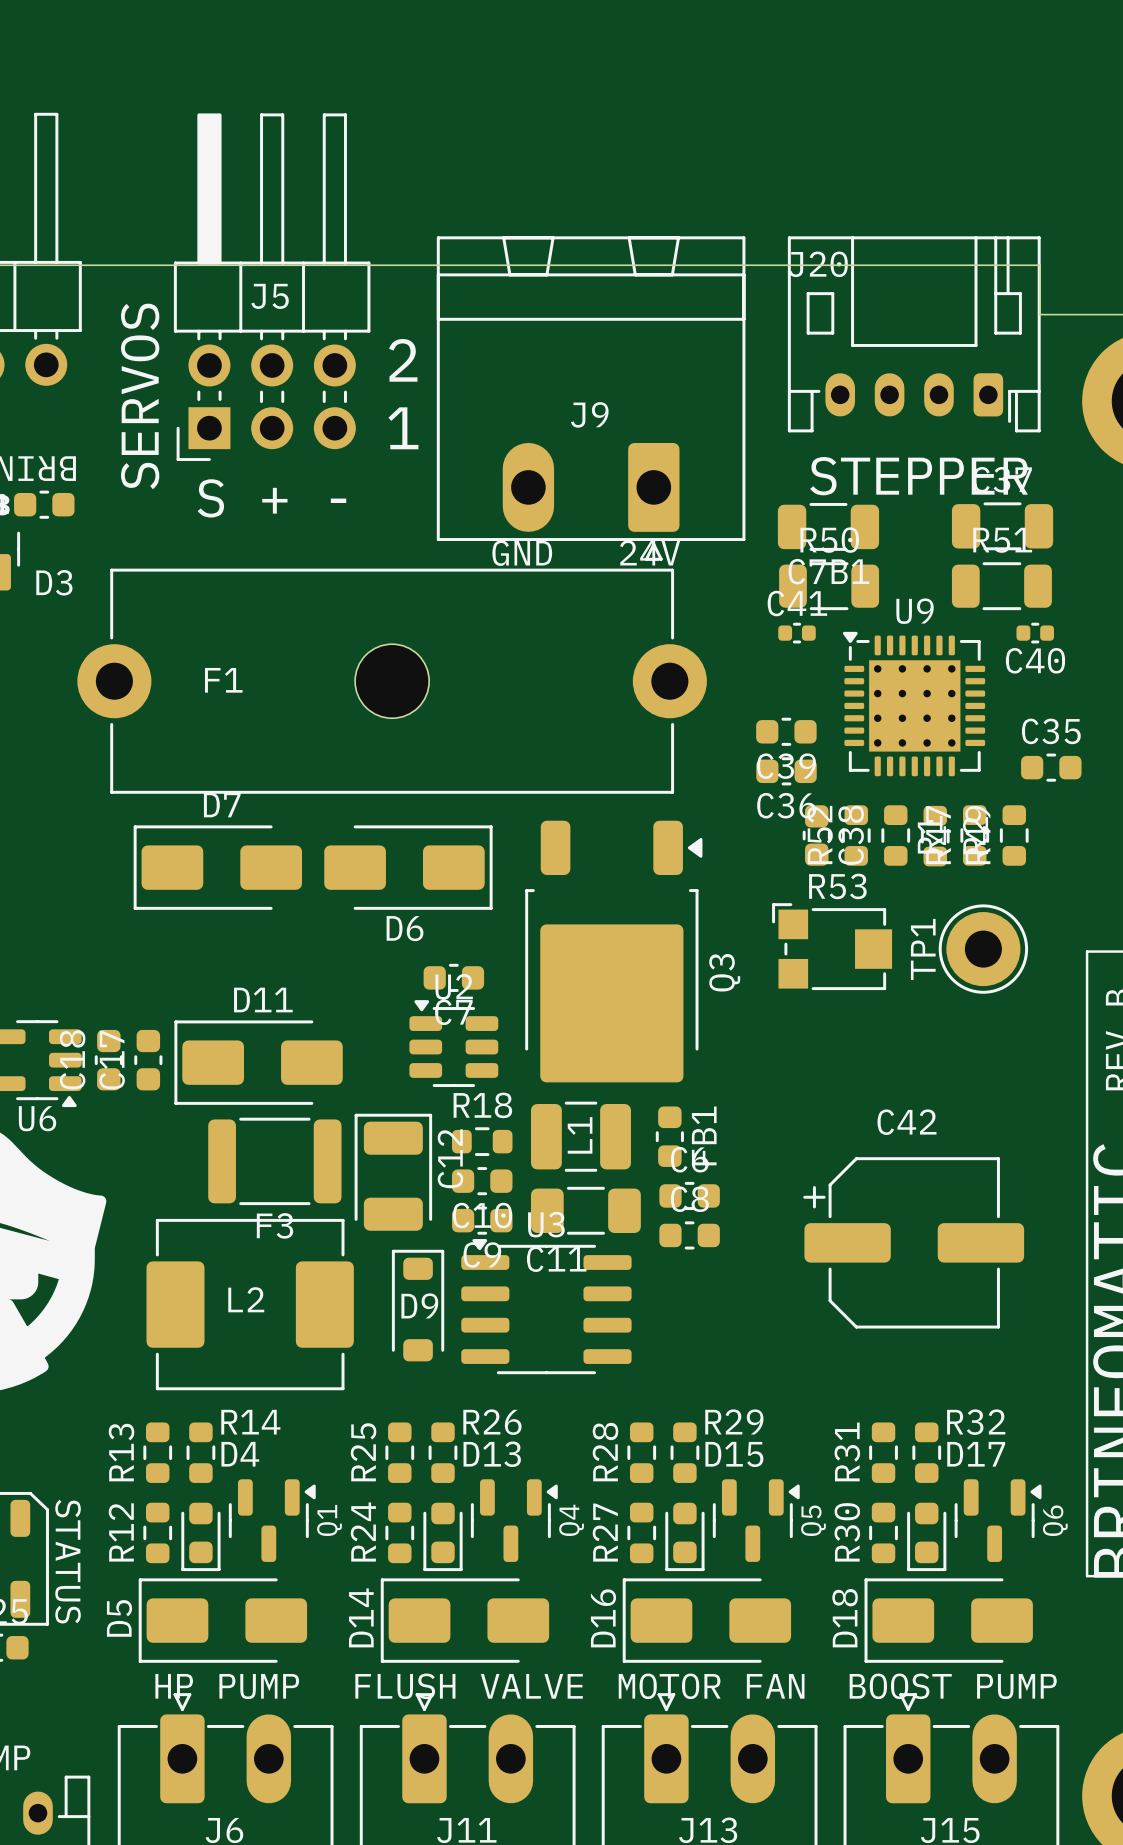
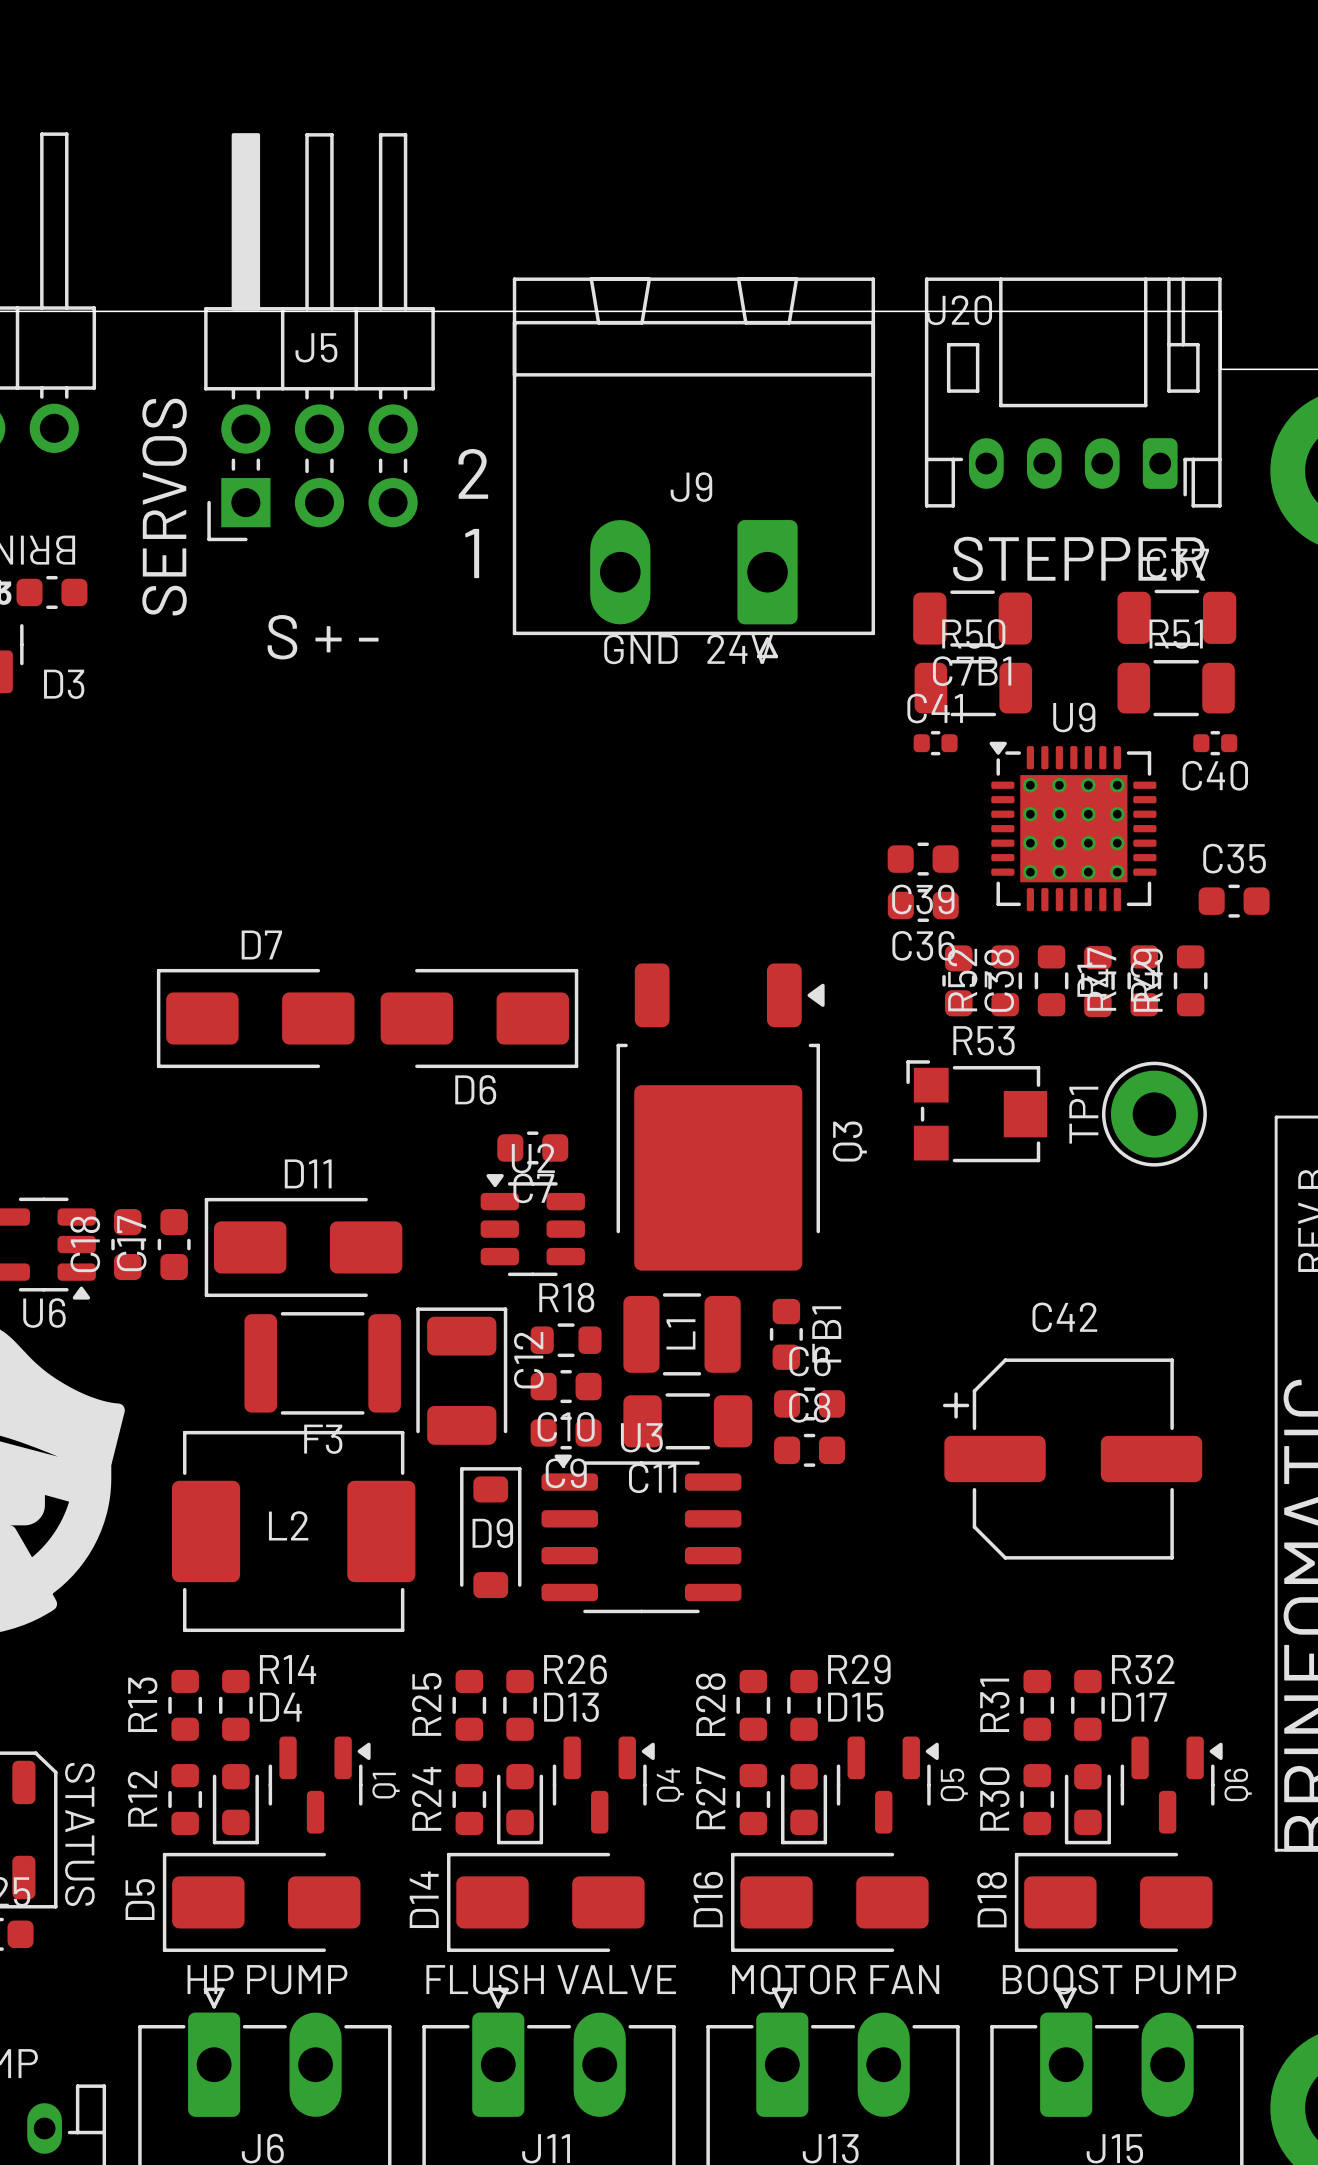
text position: 2 (403, 360) -> 2 (473, 473)
text position: SERVOS (140, 396) -> SERVOS (164, 507)
text position: 1 (403, 428) -> 1 (472, 553)
text position: S + - (271, 498) -> S + - (323, 637)
F1: (392, 681) -> none

